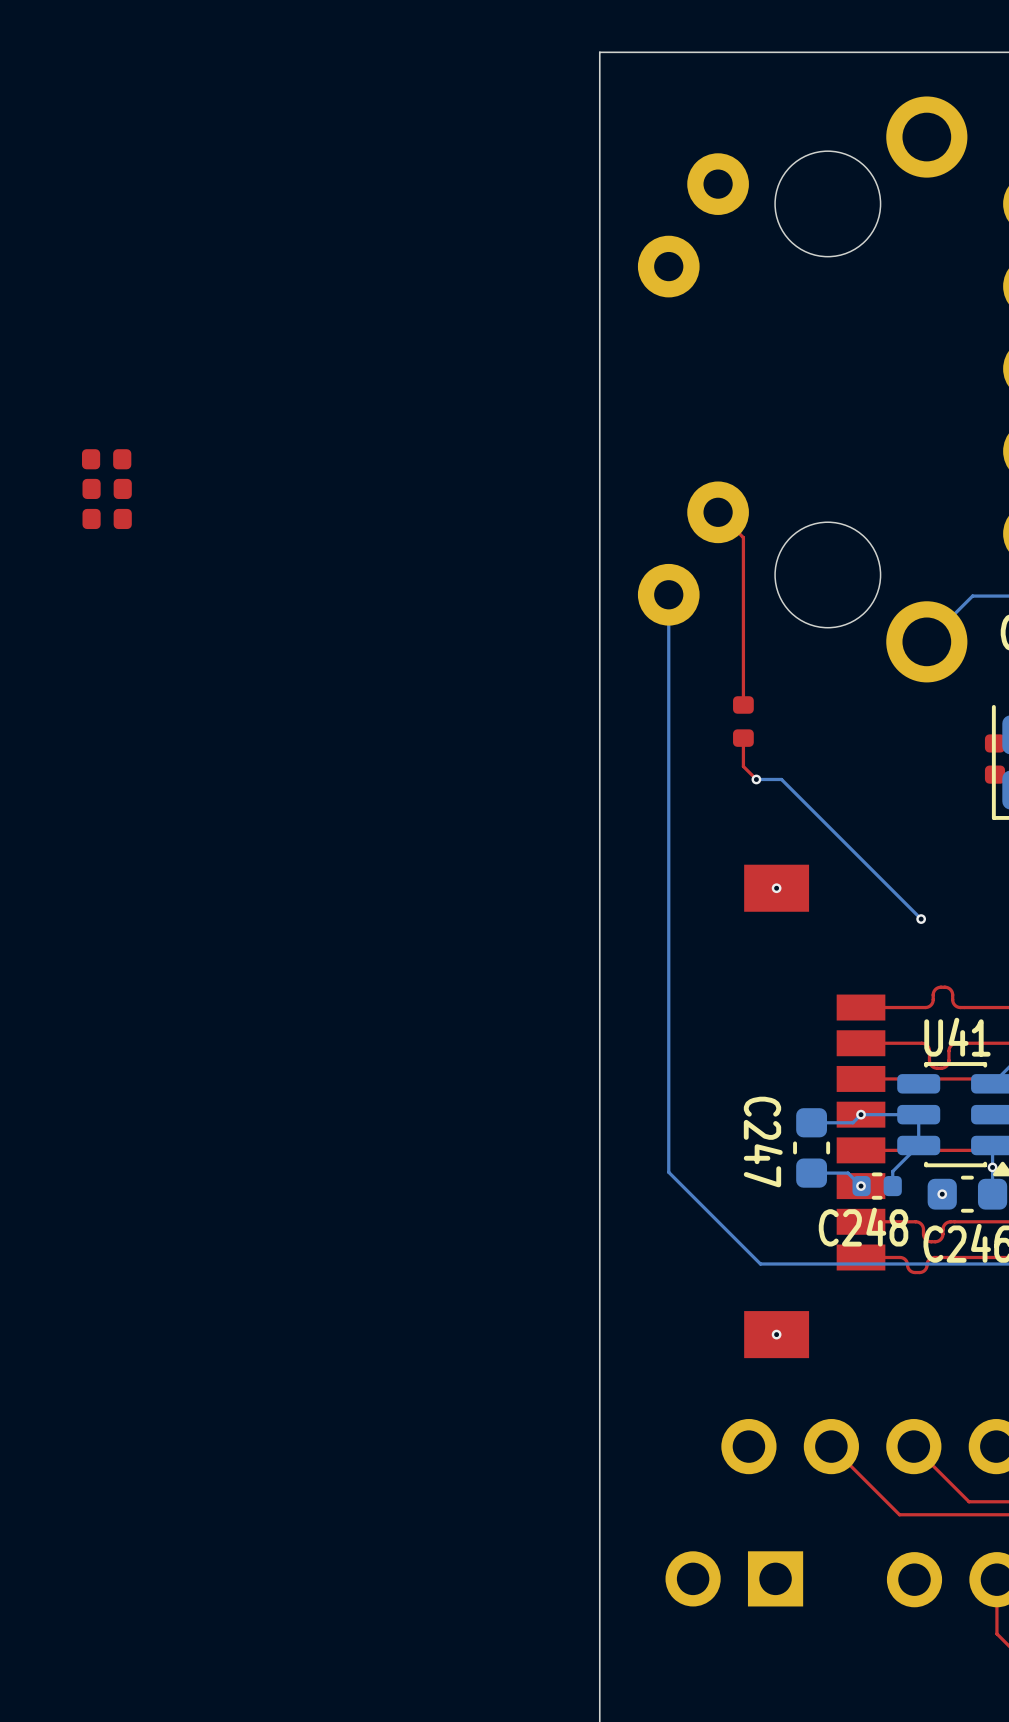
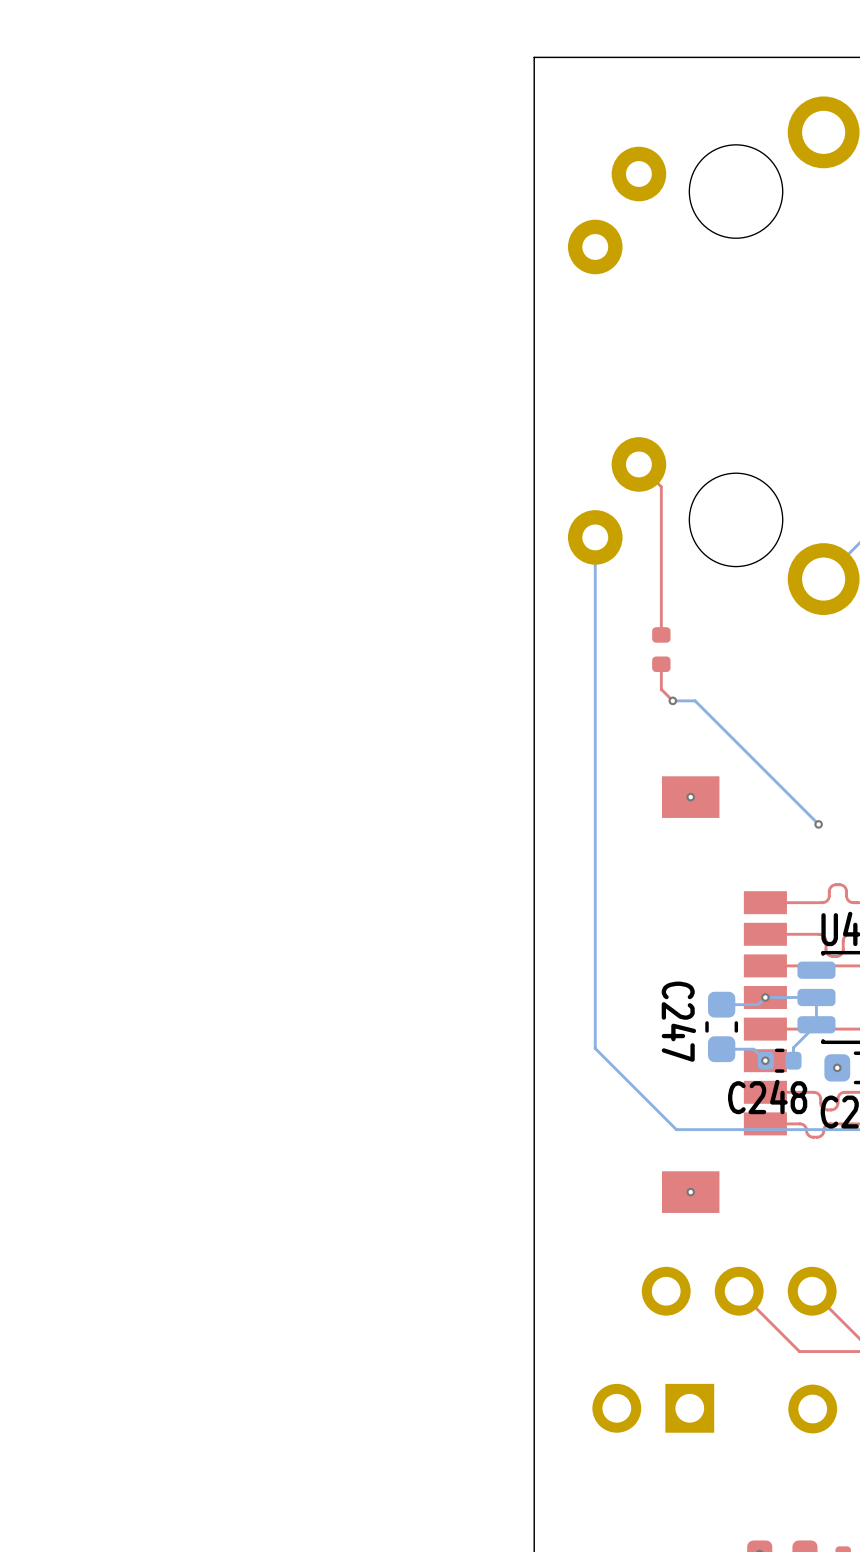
part: (106, 459) -> none
part: (107, 488) -> none
part: (107, 518) -> none

